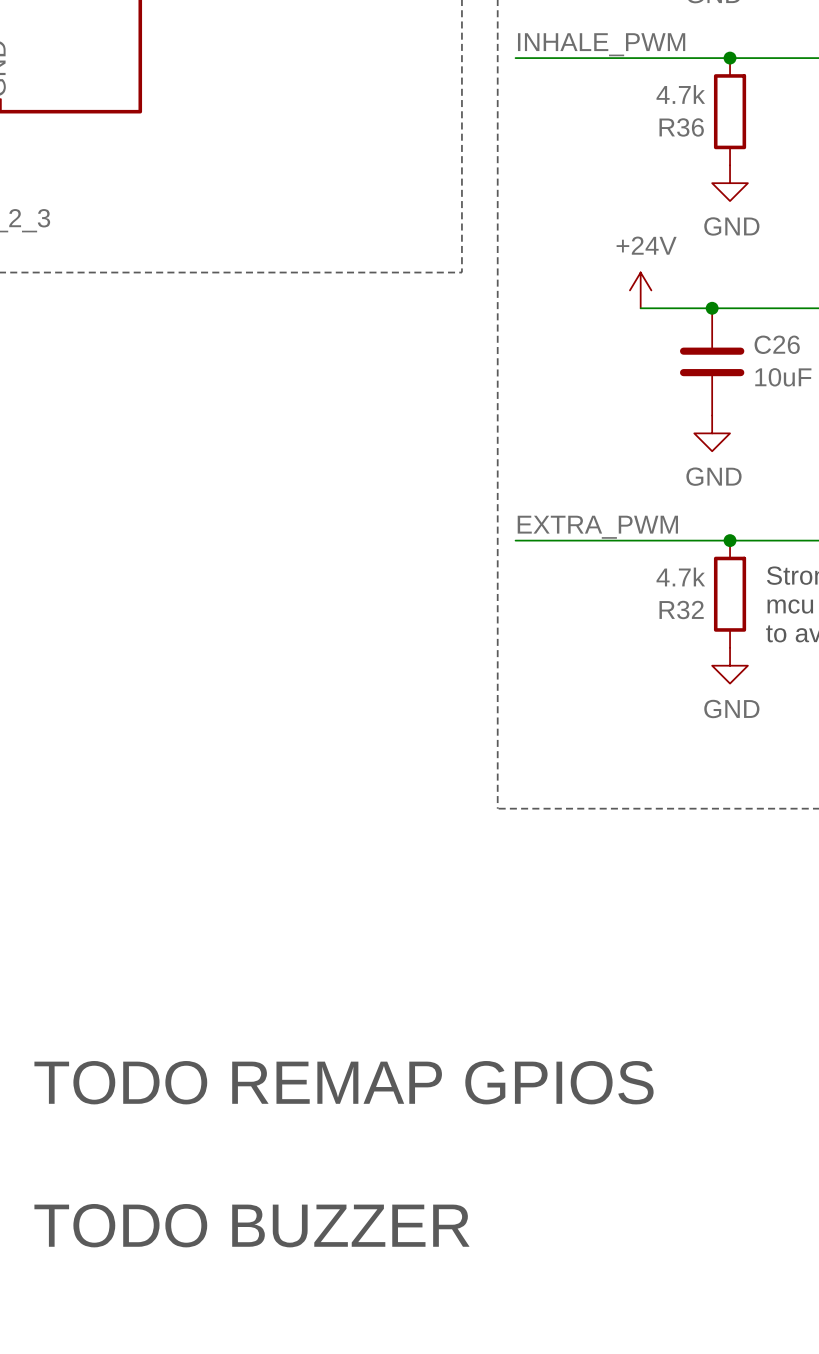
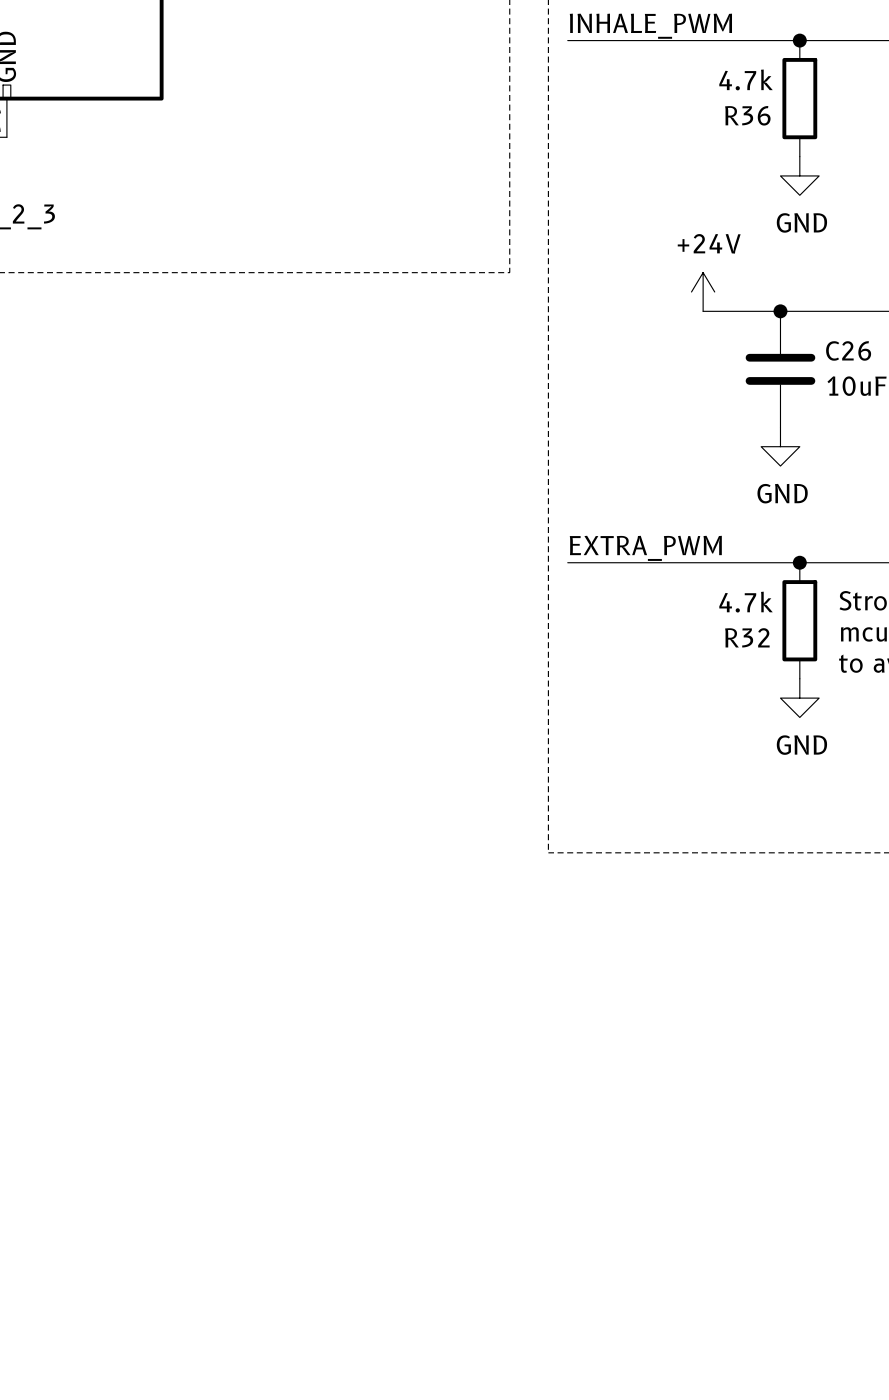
text: TODO REMAP GPIOS (344, 1082) -> none
text: TODO BUZZER (251, 1225) -> none

